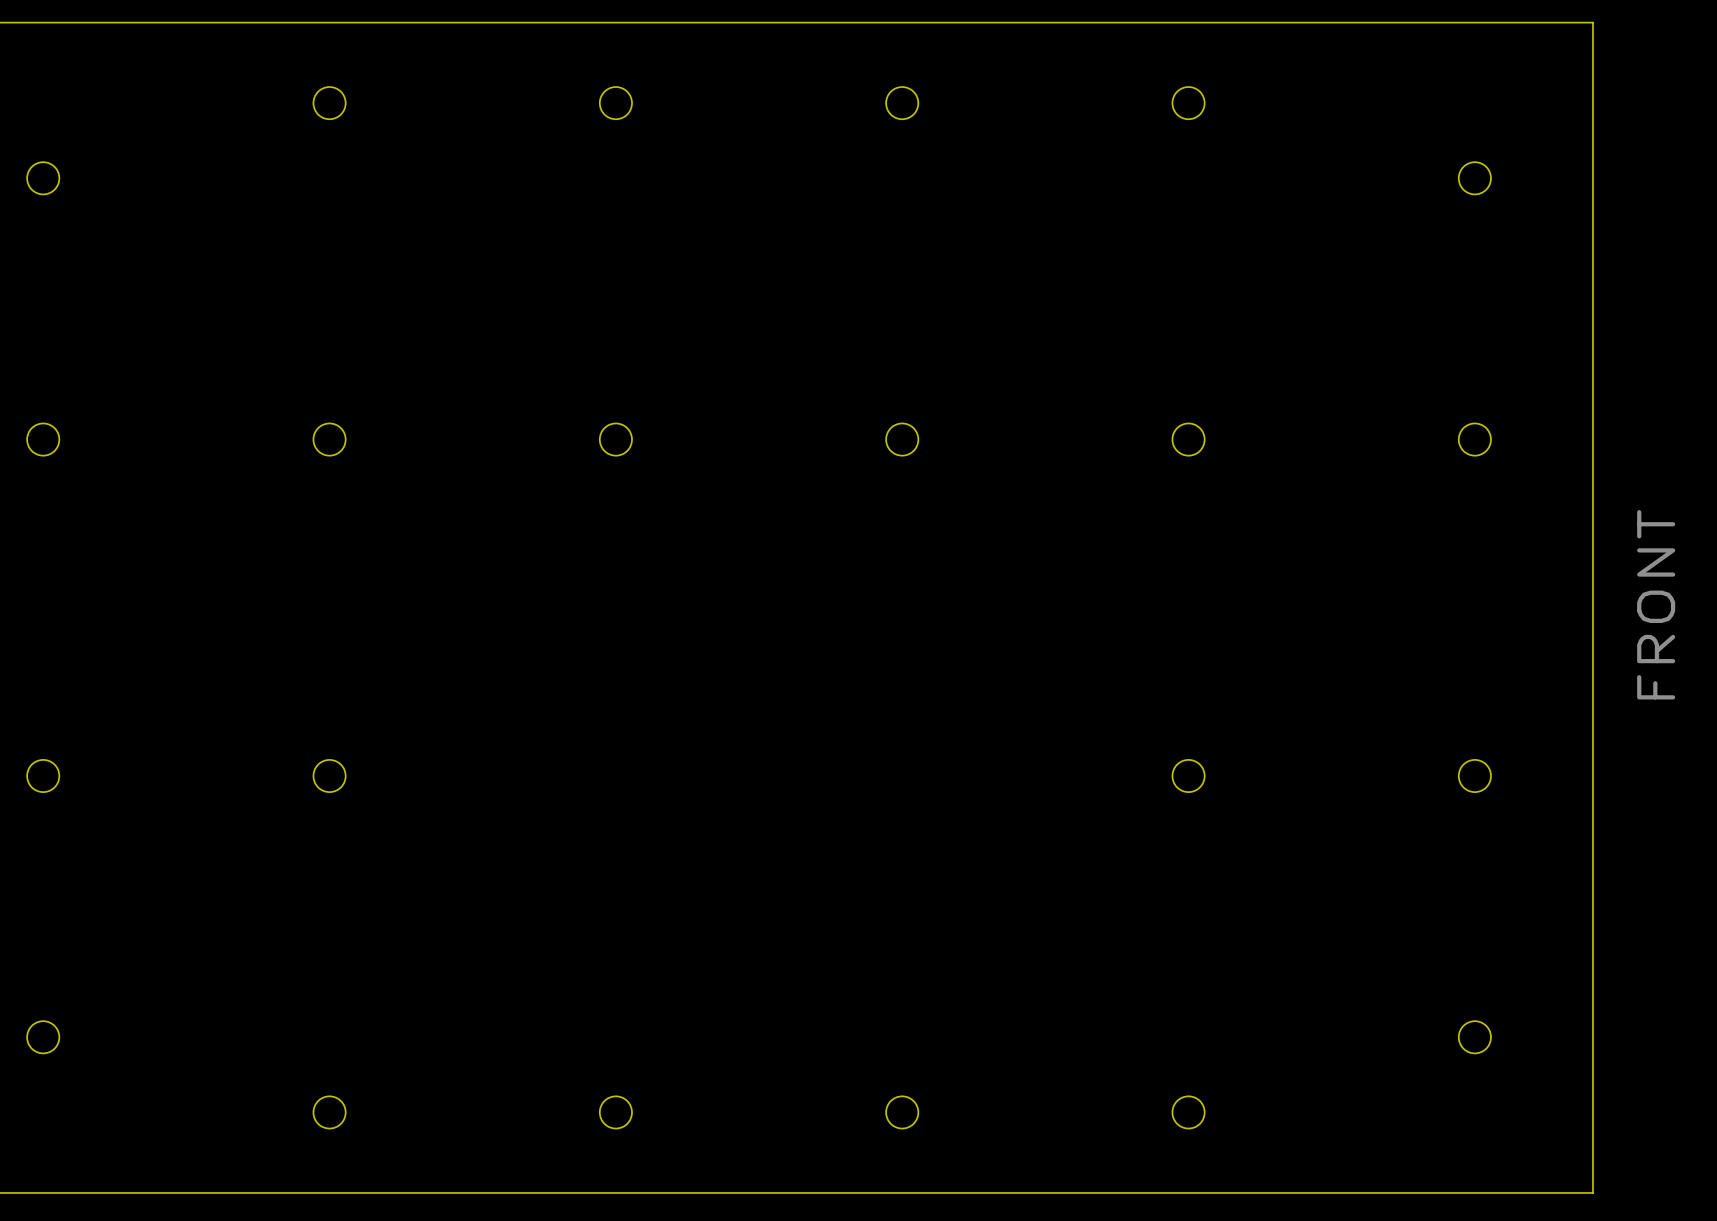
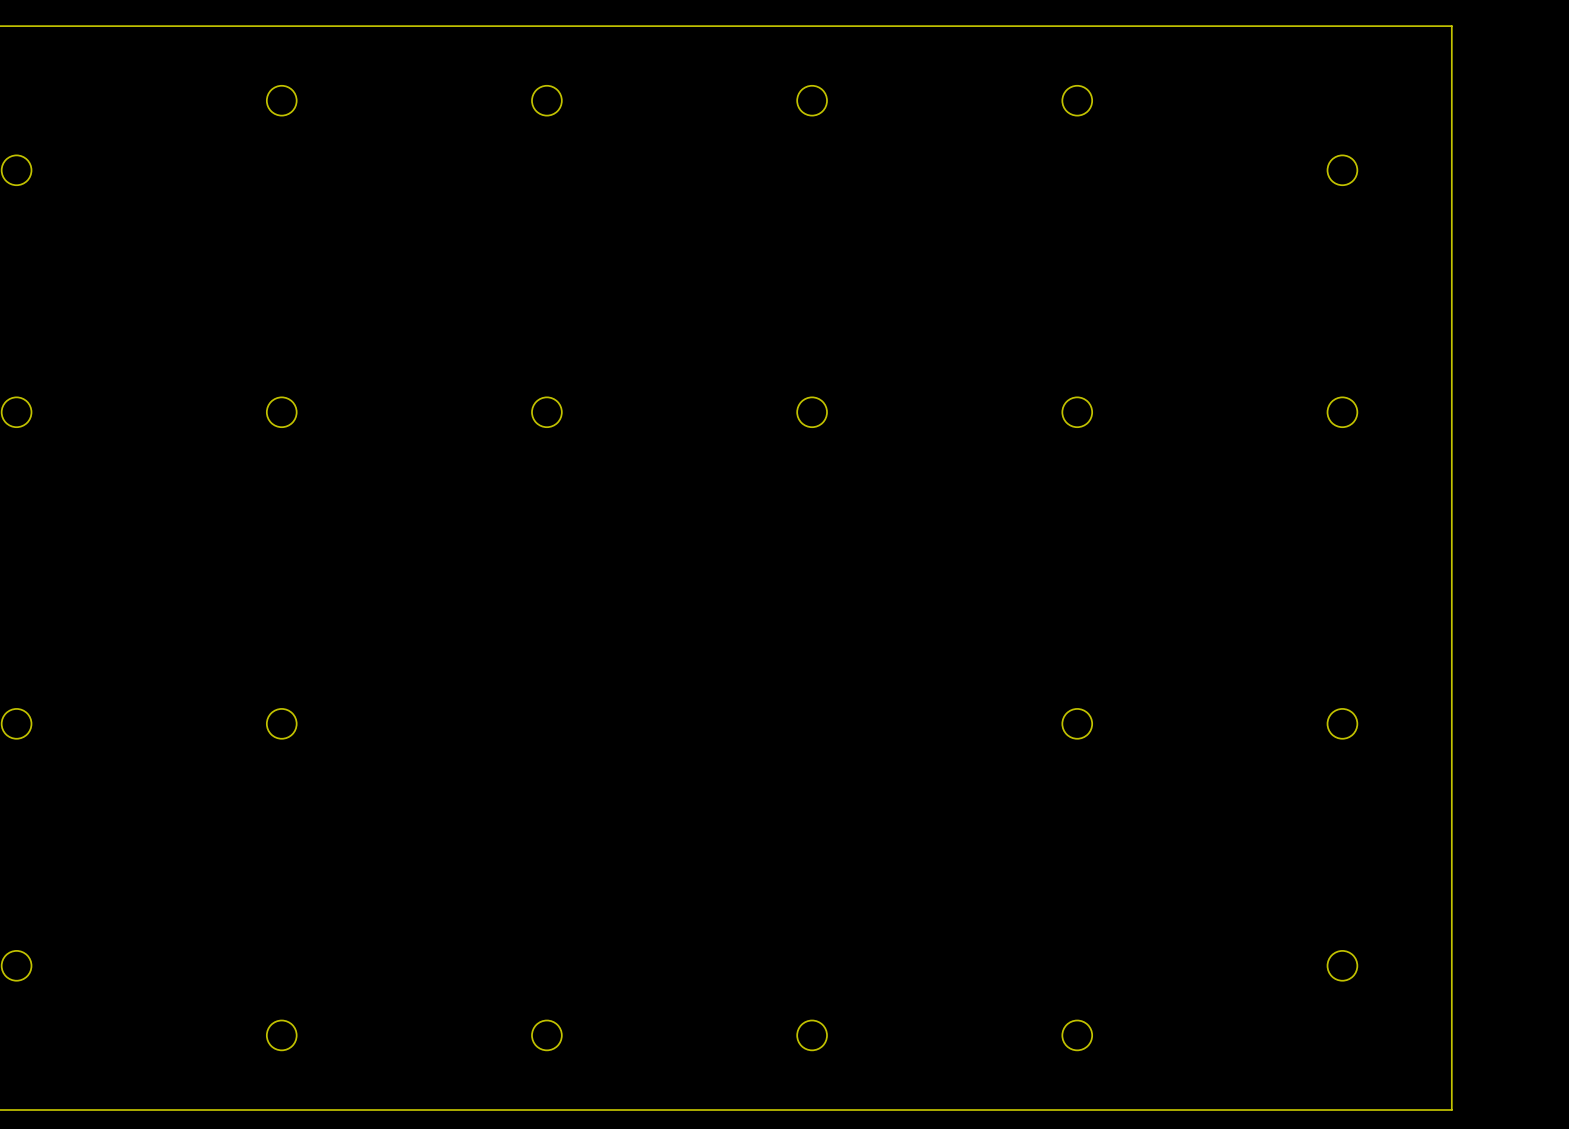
text: FRONT (1656, 604) -> none

